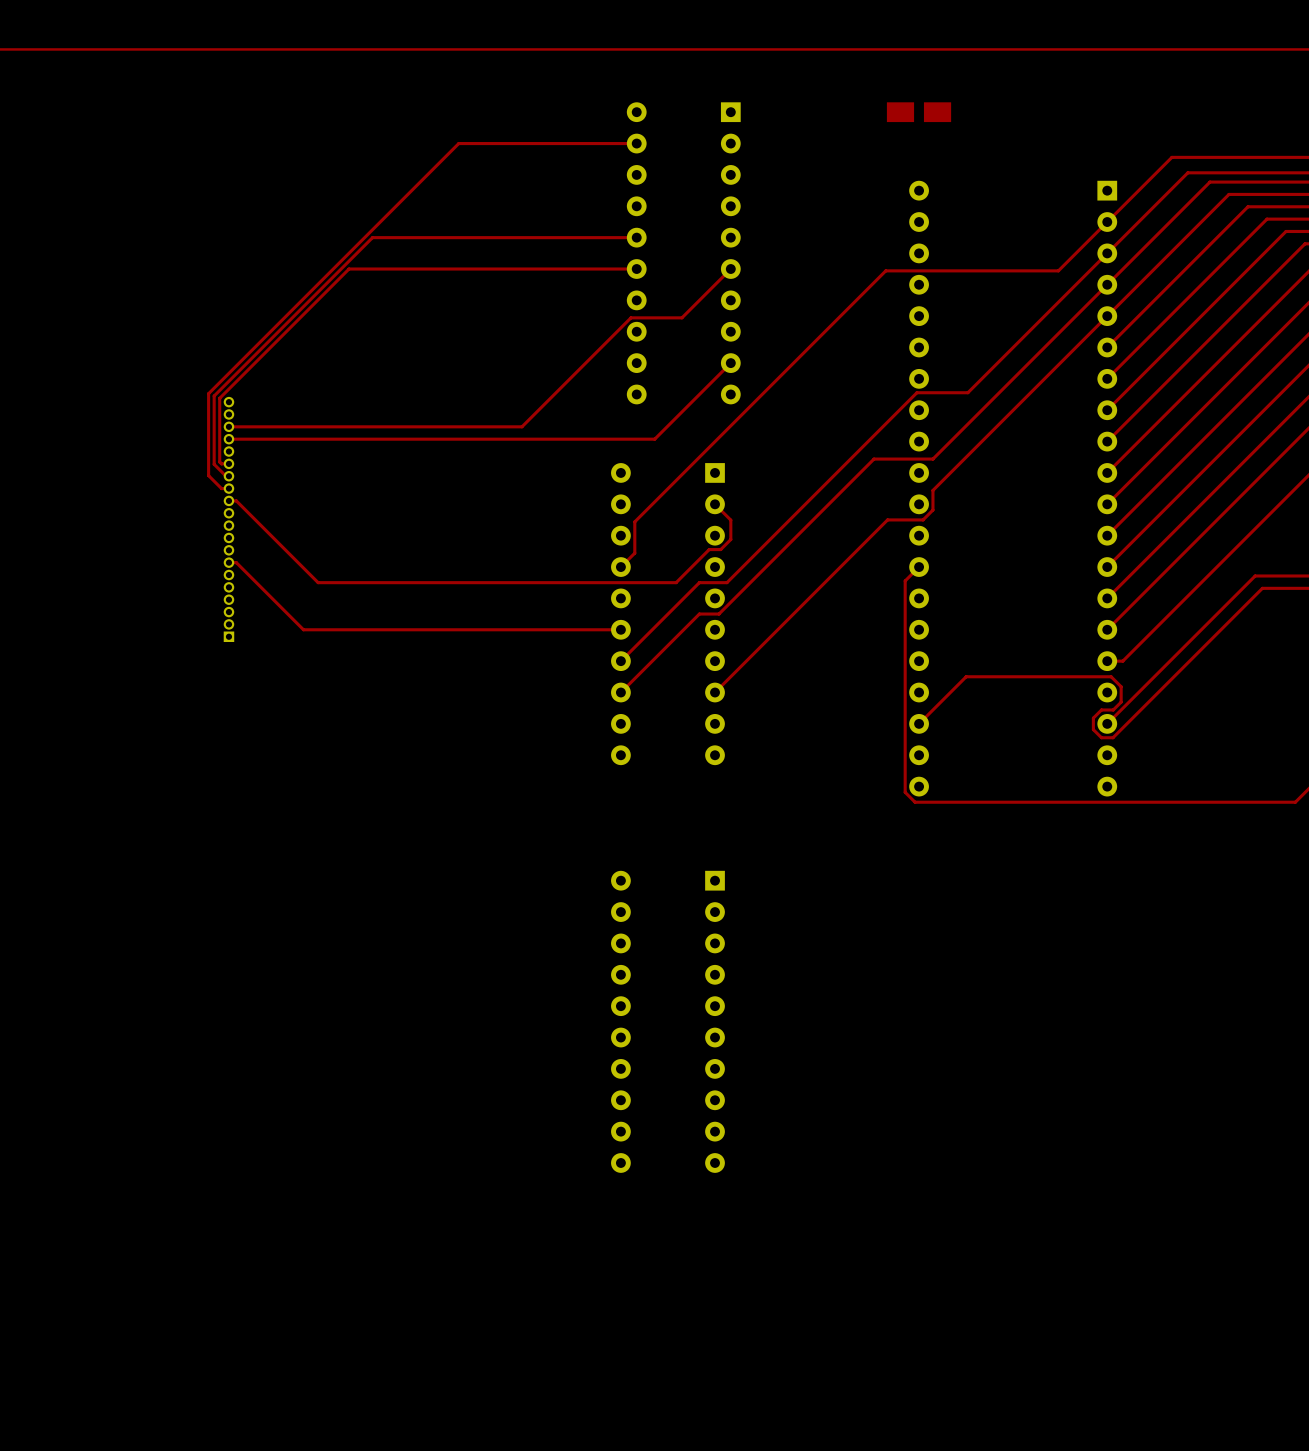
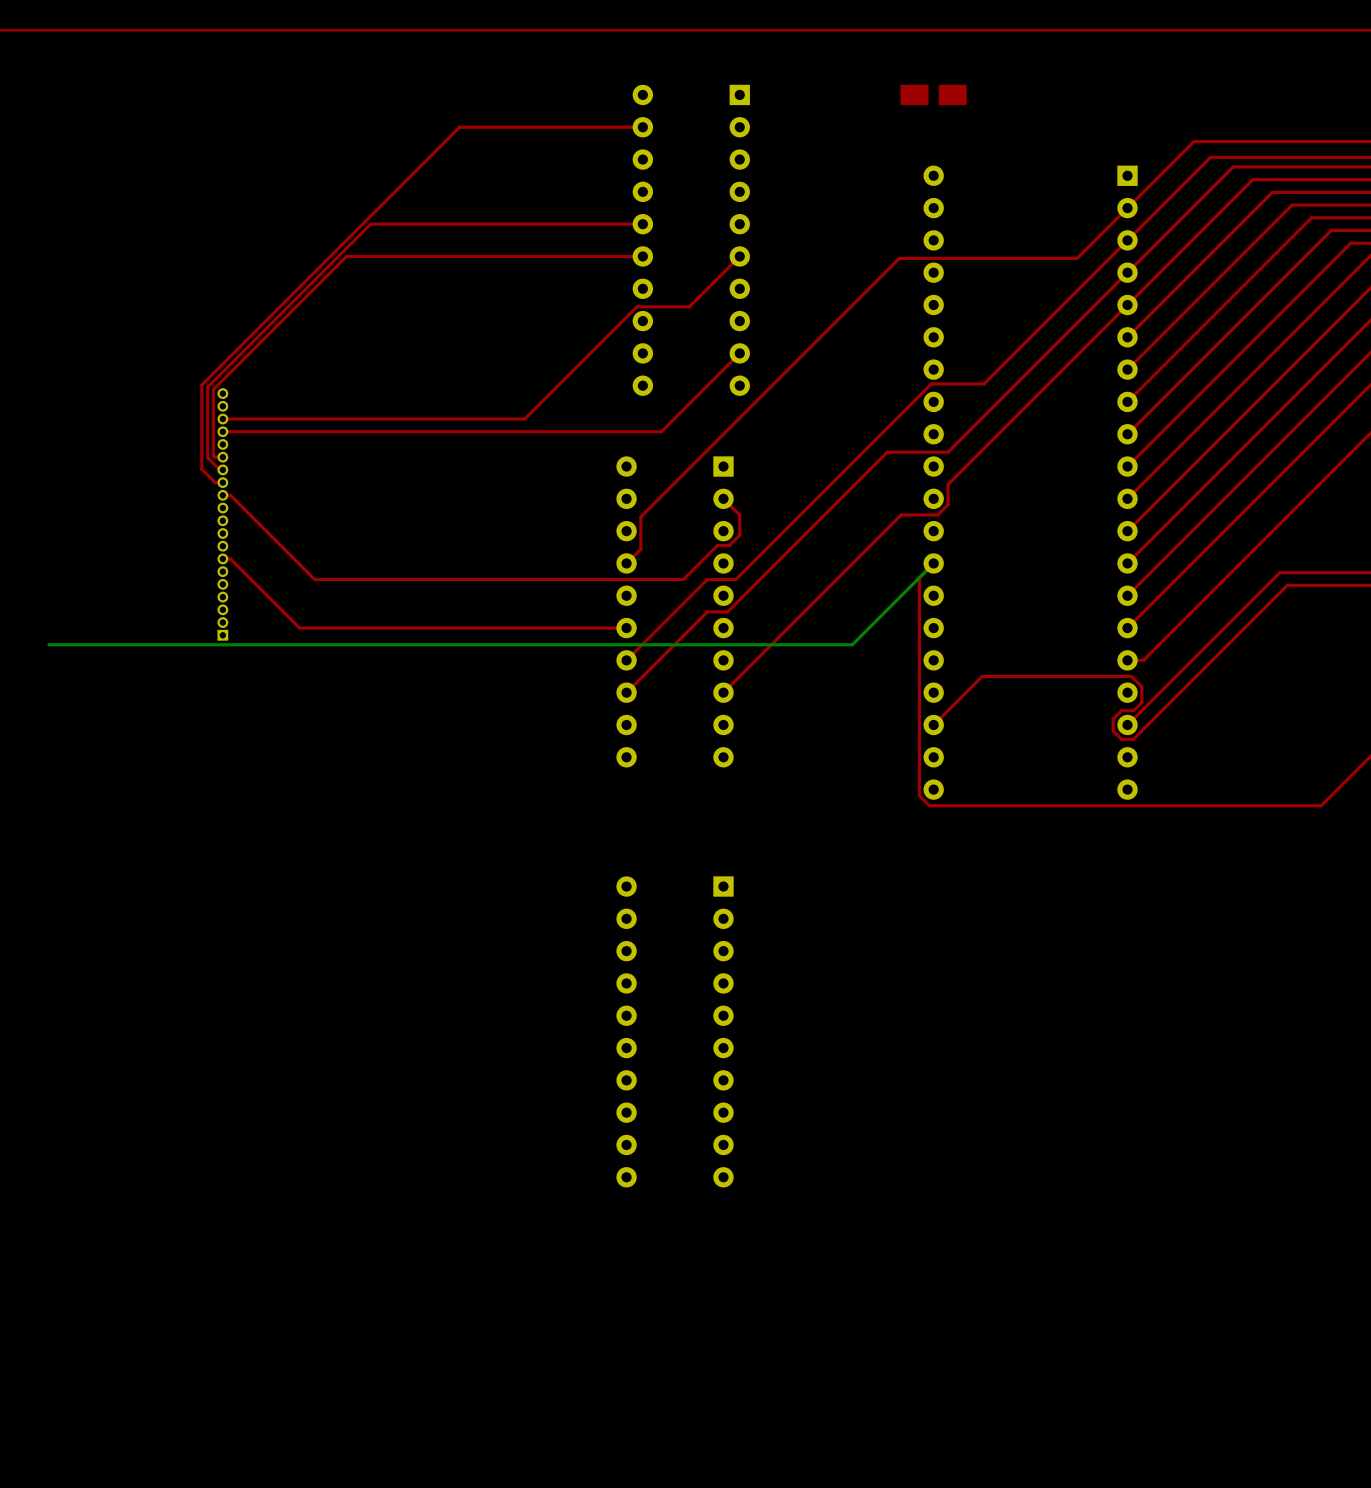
bottom track: none -> (933, 563) (852, 644) (48, 644)

